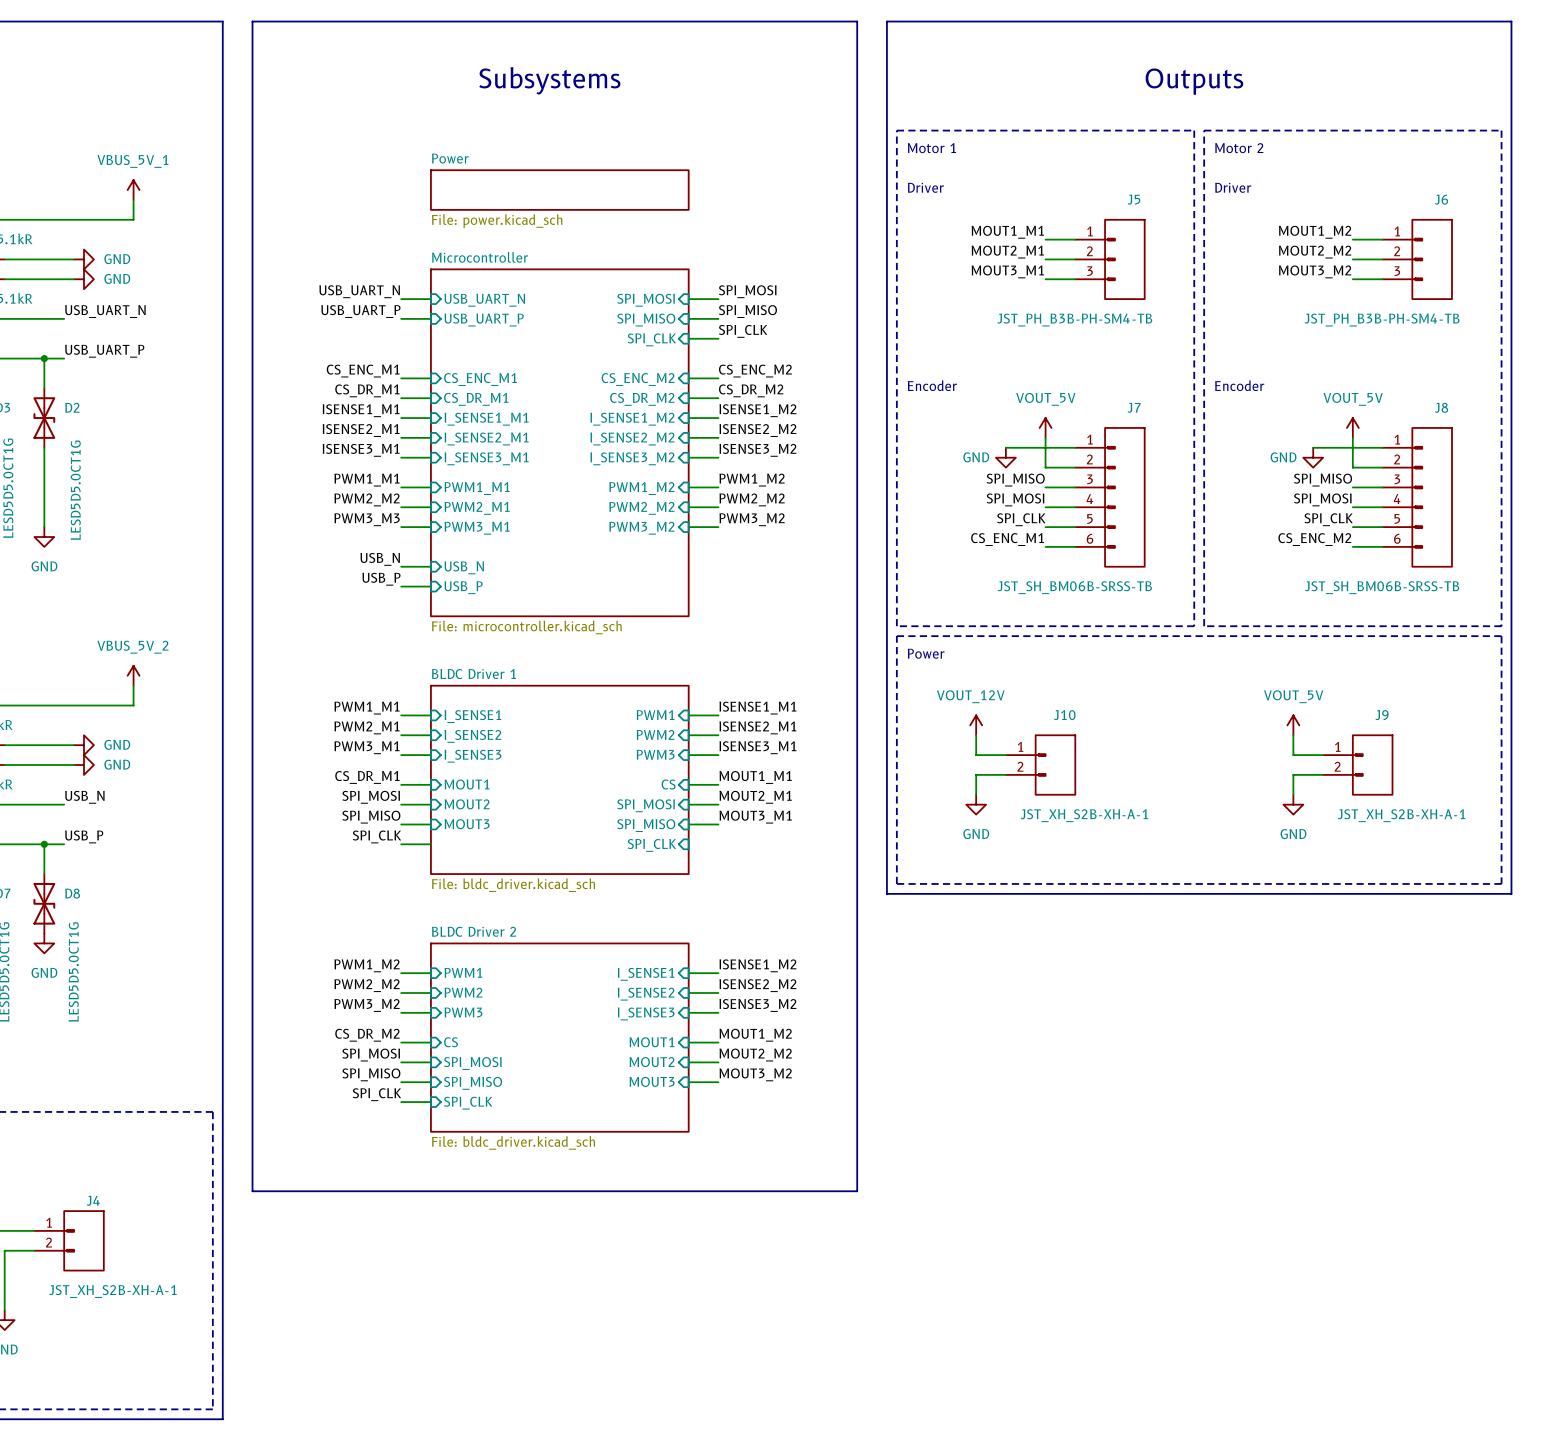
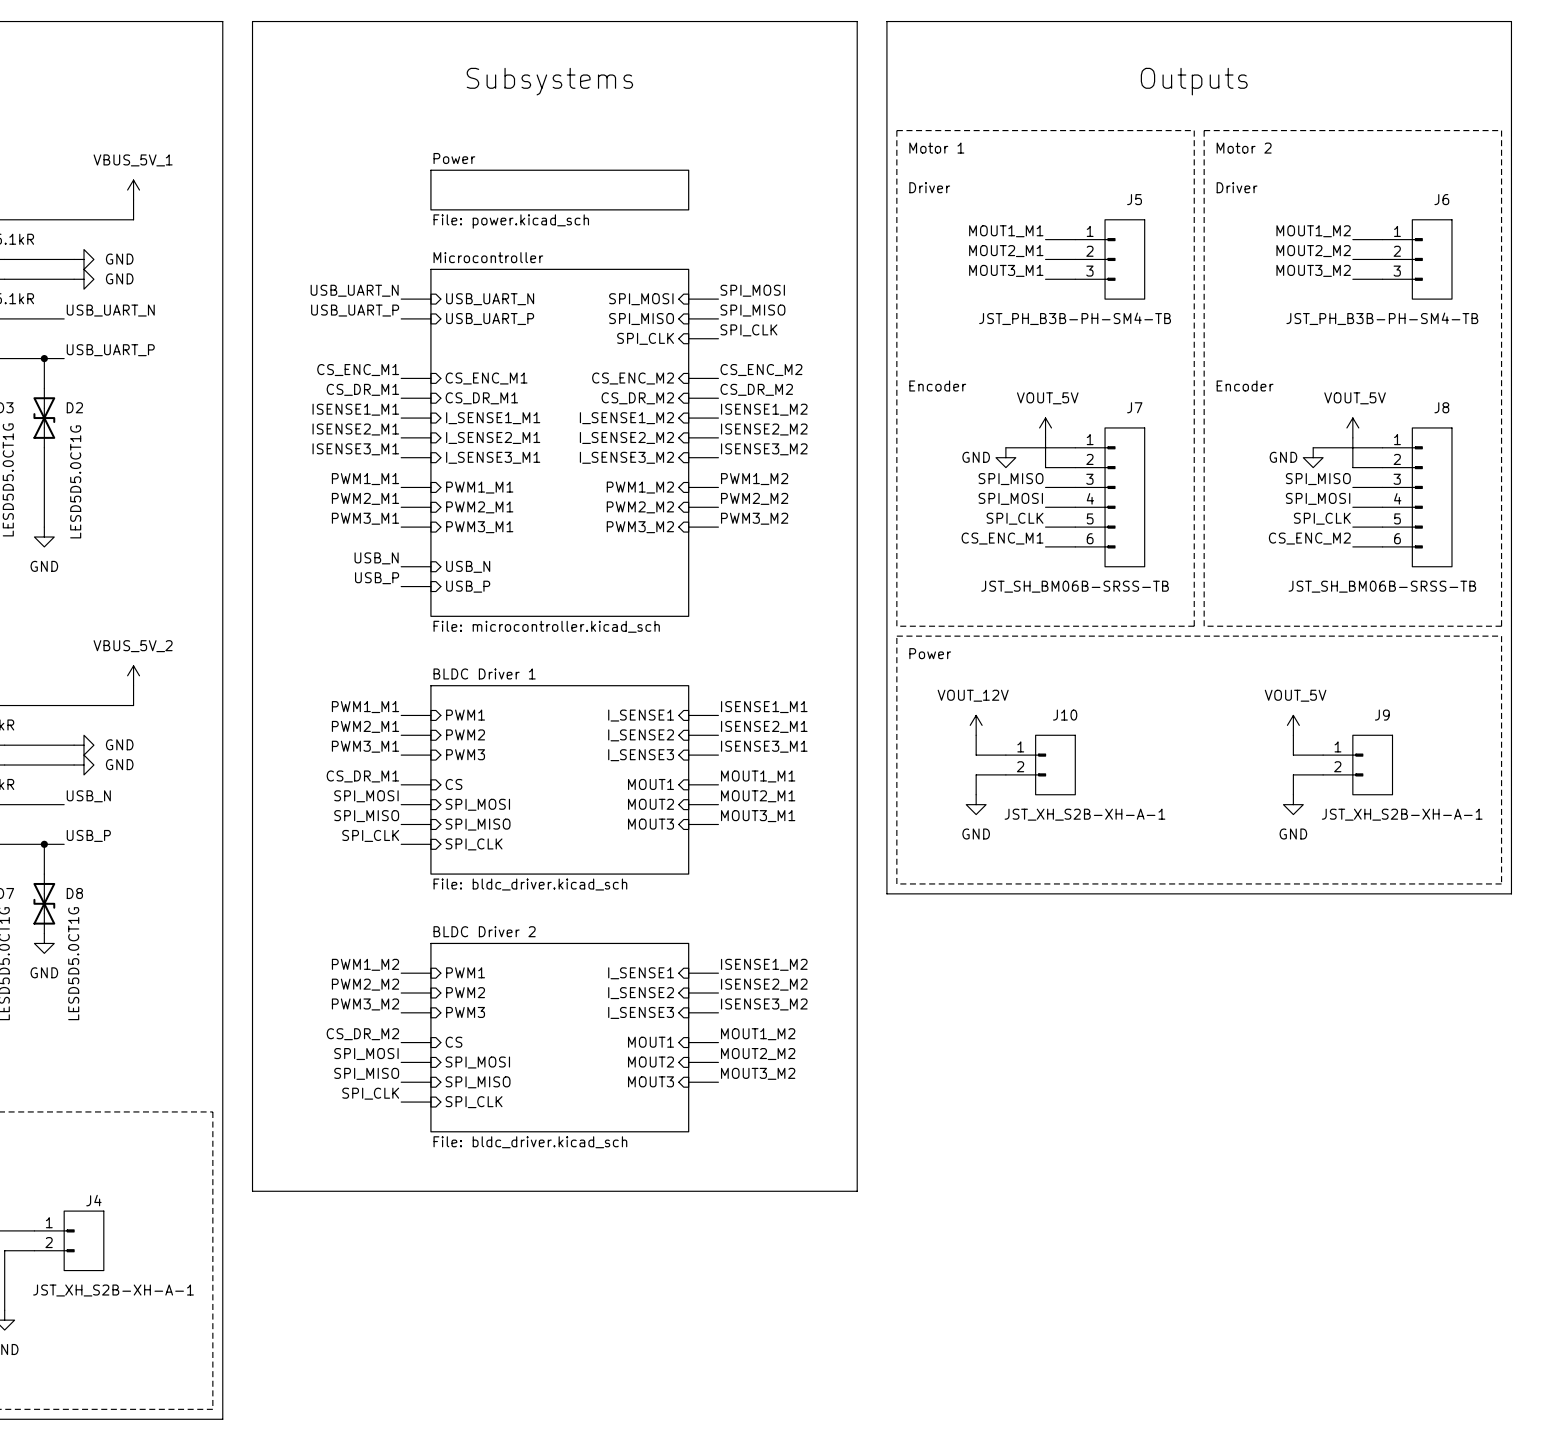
label: PWM2_M2 (367, 499) -> PWM2_M1 (365, 498)
label: PWM3_M3 (367, 519) -> PWM3_M1 (365, 518)
sheet pin: PWM1 (655, 715) -> I_SENSE1 (641, 715)
sheet pin: I_SENSE1 (472, 716) -> PWM1 (465, 715)
sheet pin: PWM2 (655, 734) -> I_SENSE2 (641, 735)
sheet pin: I_SENSE2 (472, 736) -> PWM2 (465, 734)
sheet pin: PWM3 (655, 754) -> I_SENSE3 (641, 755)
sheet pin: I_SENSE3 (472, 756) -> PWM3 (465, 754)
sheet pin: MOUT1 (467, 784) -> CS (453, 784)
sheet pin: CS (668, 784) -> MOUT1 (651, 784)
sheet pin: MOUT2 (467, 804) -> SPI_MOSI (477, 804)
sheet pin: SPI_MOSI (646, 805) -> MOUT2 (651, 804)
sheet pin: MOUT3 (467, 824) -> SPI_MISO (478, 824)
sheet pin: SPI_MISO (646, 825) -> MOUT3 (651, 824)
sheet pin: none -> SPI_CLK (474, 844)
sheet pin: SPI_CLK (651, 845) -> none

